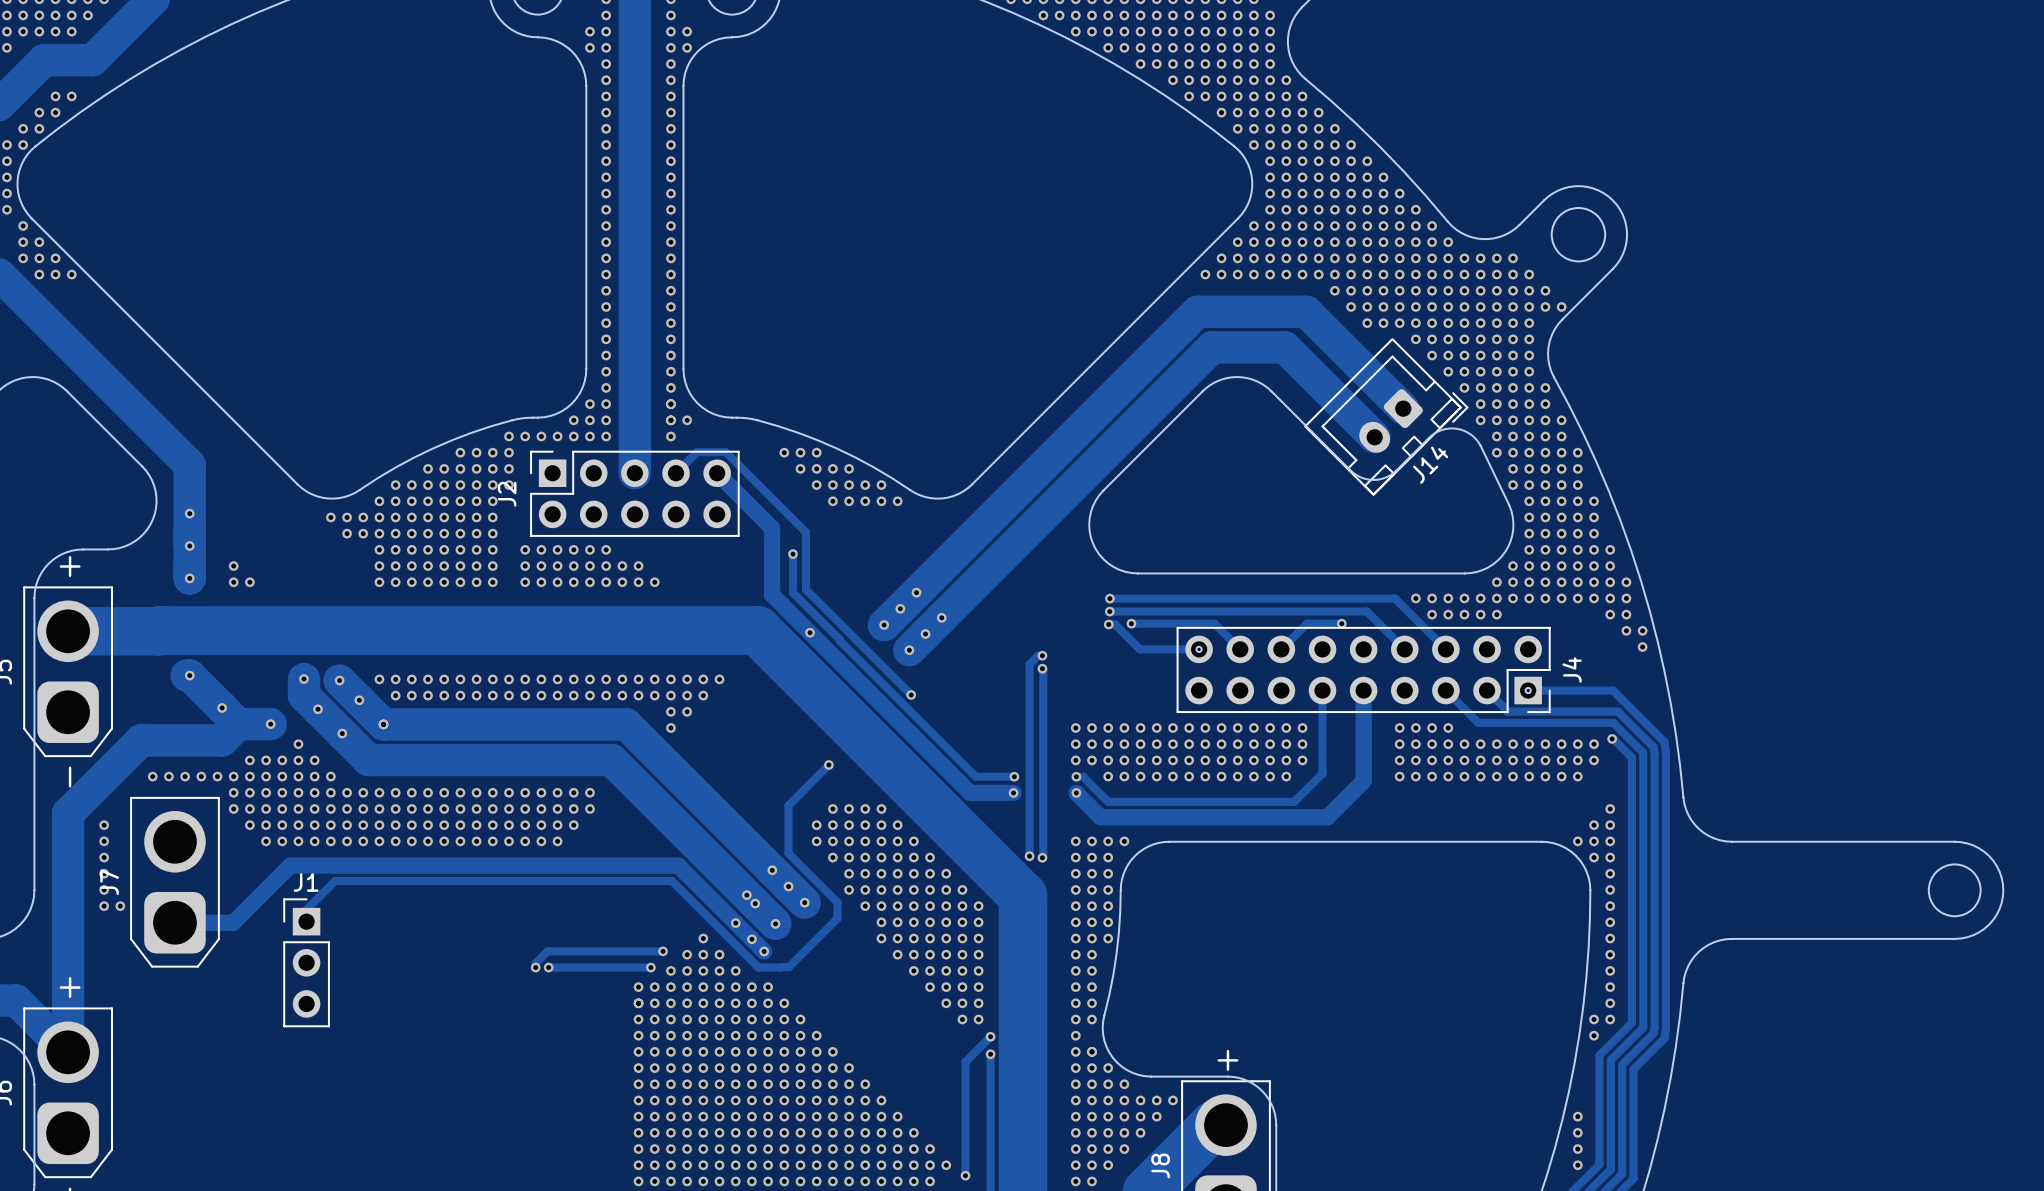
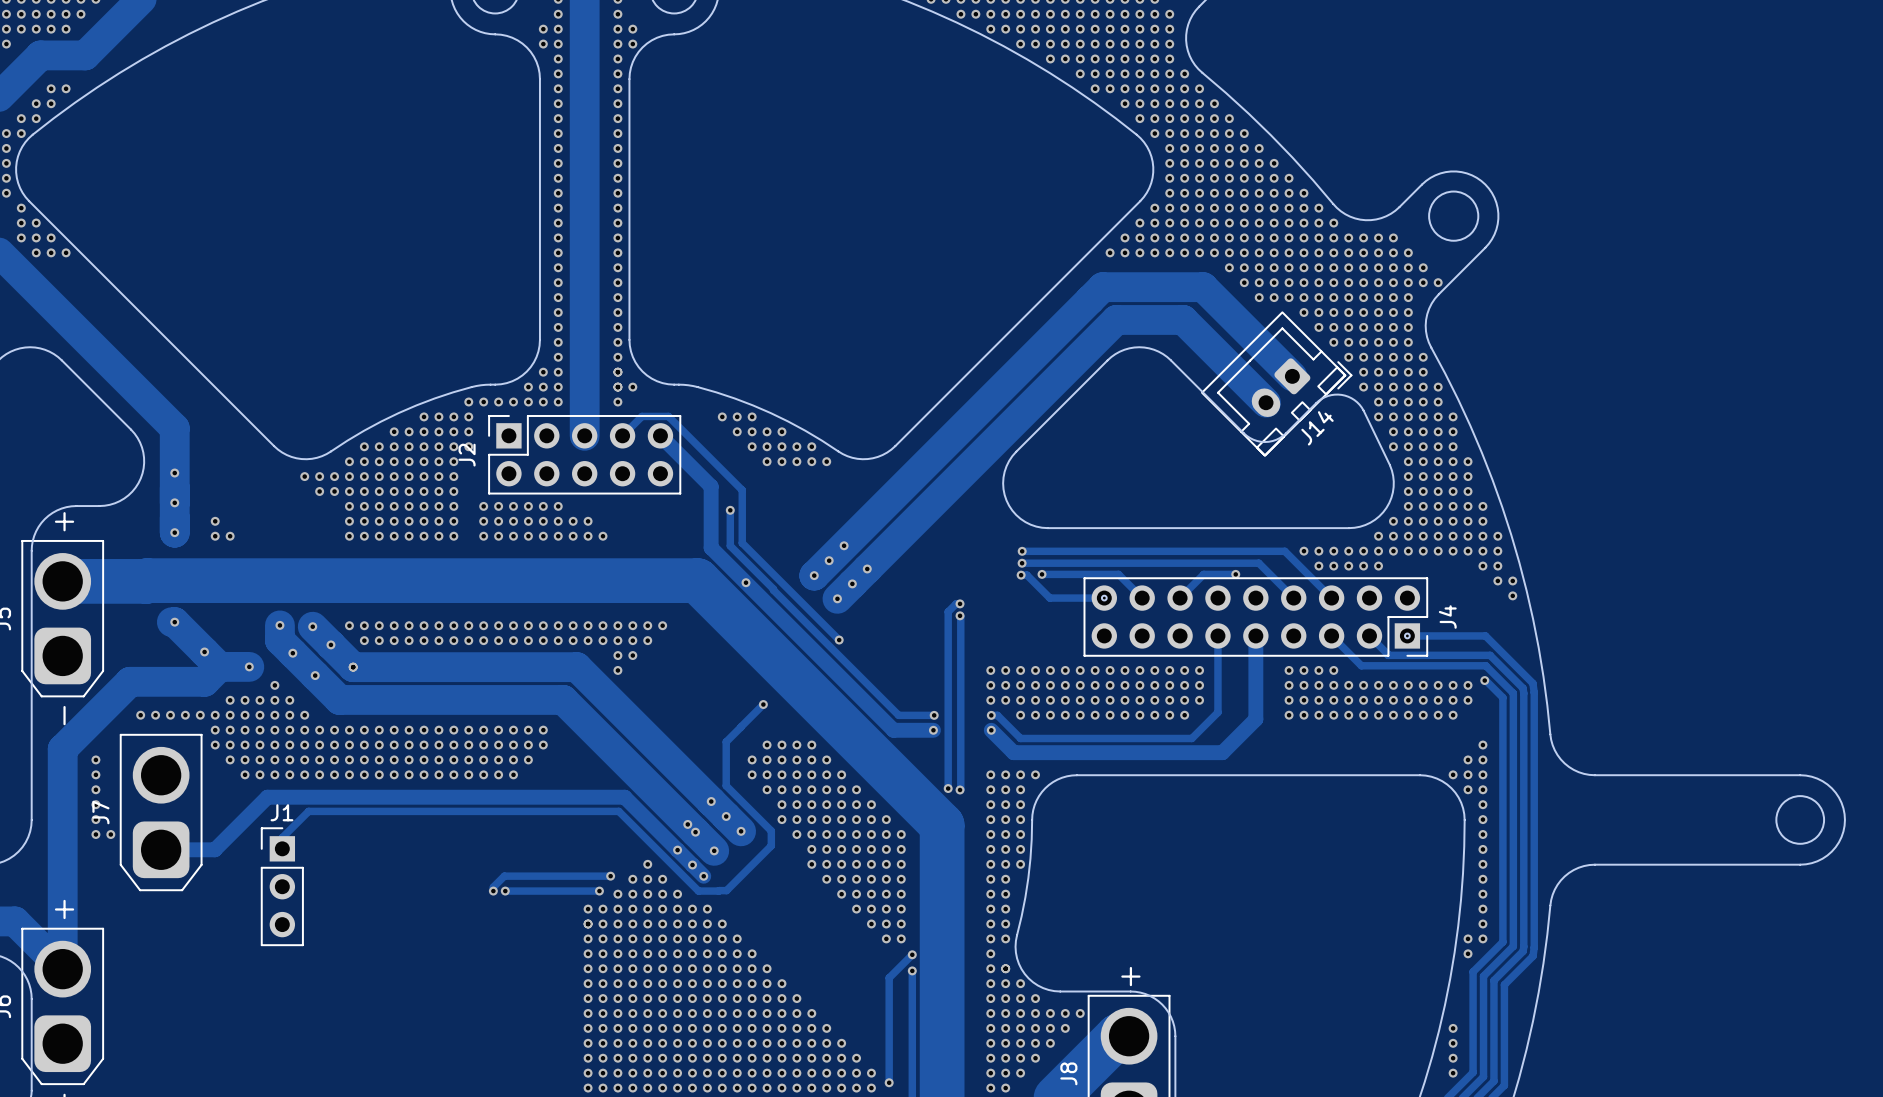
via: none -> (871, 1088)

